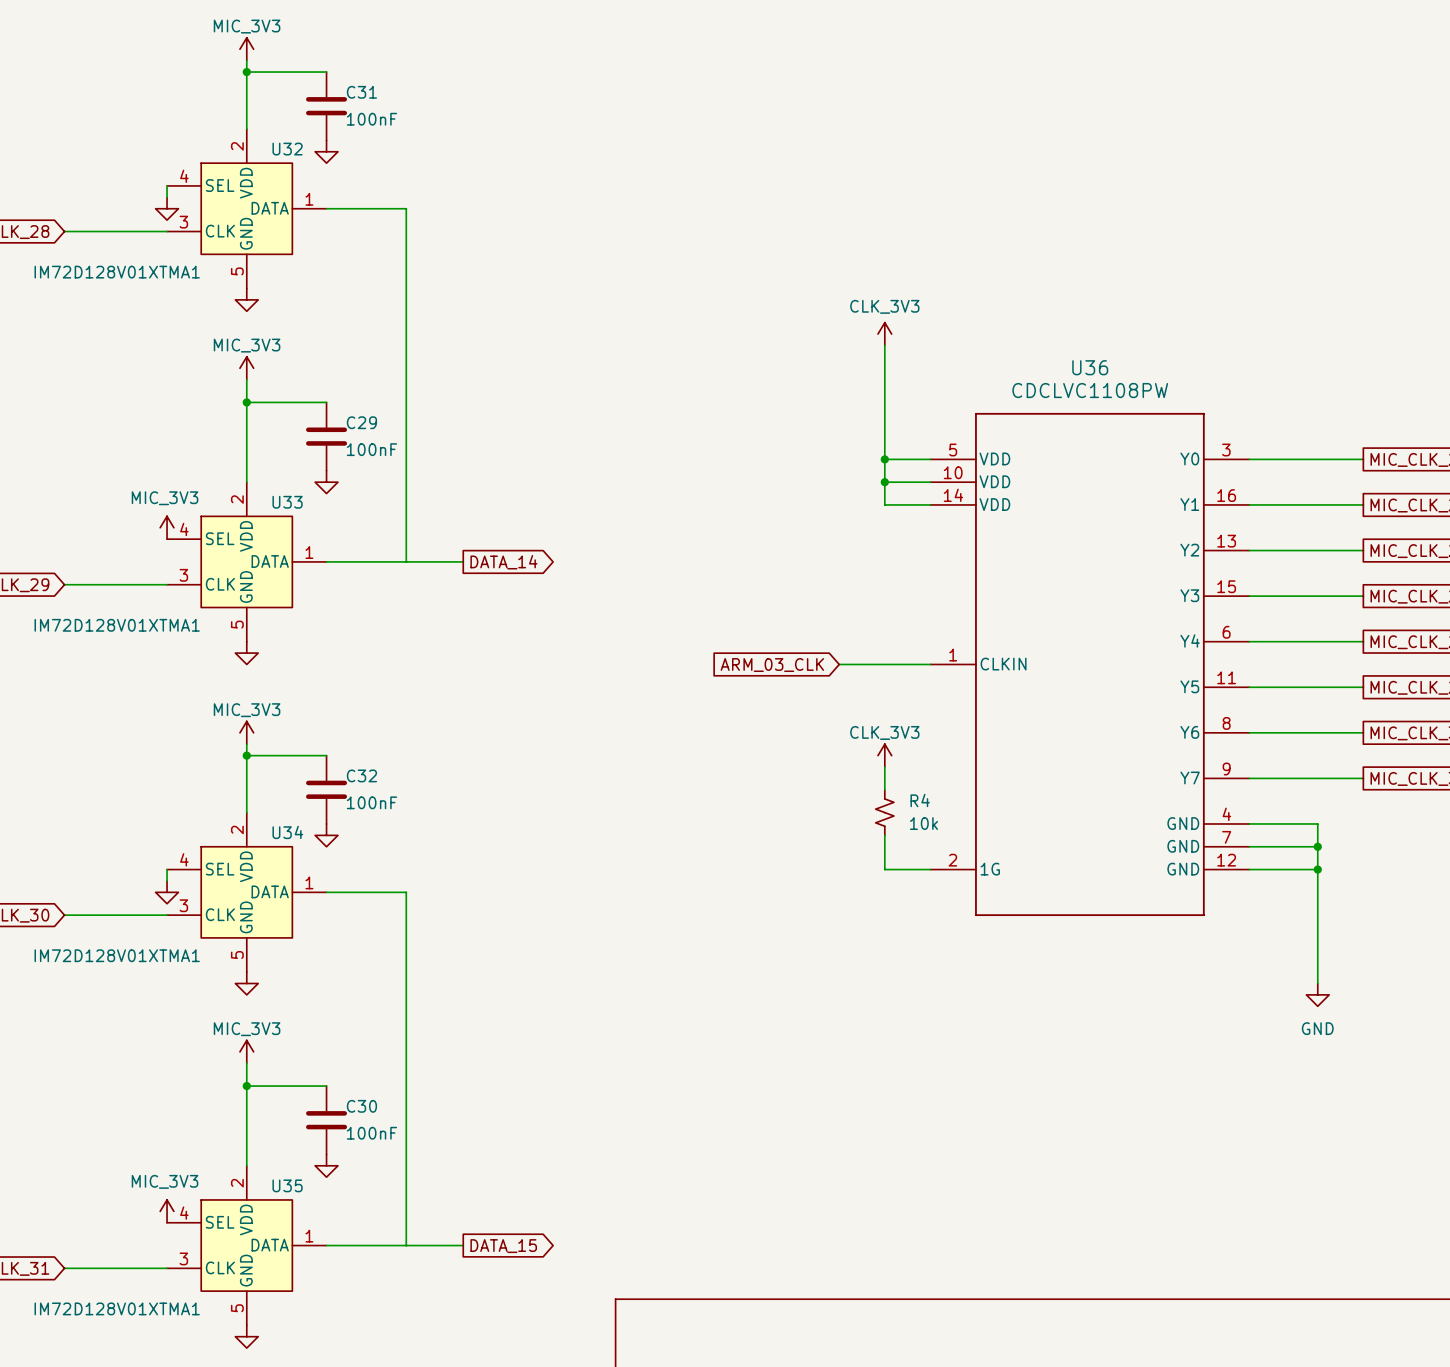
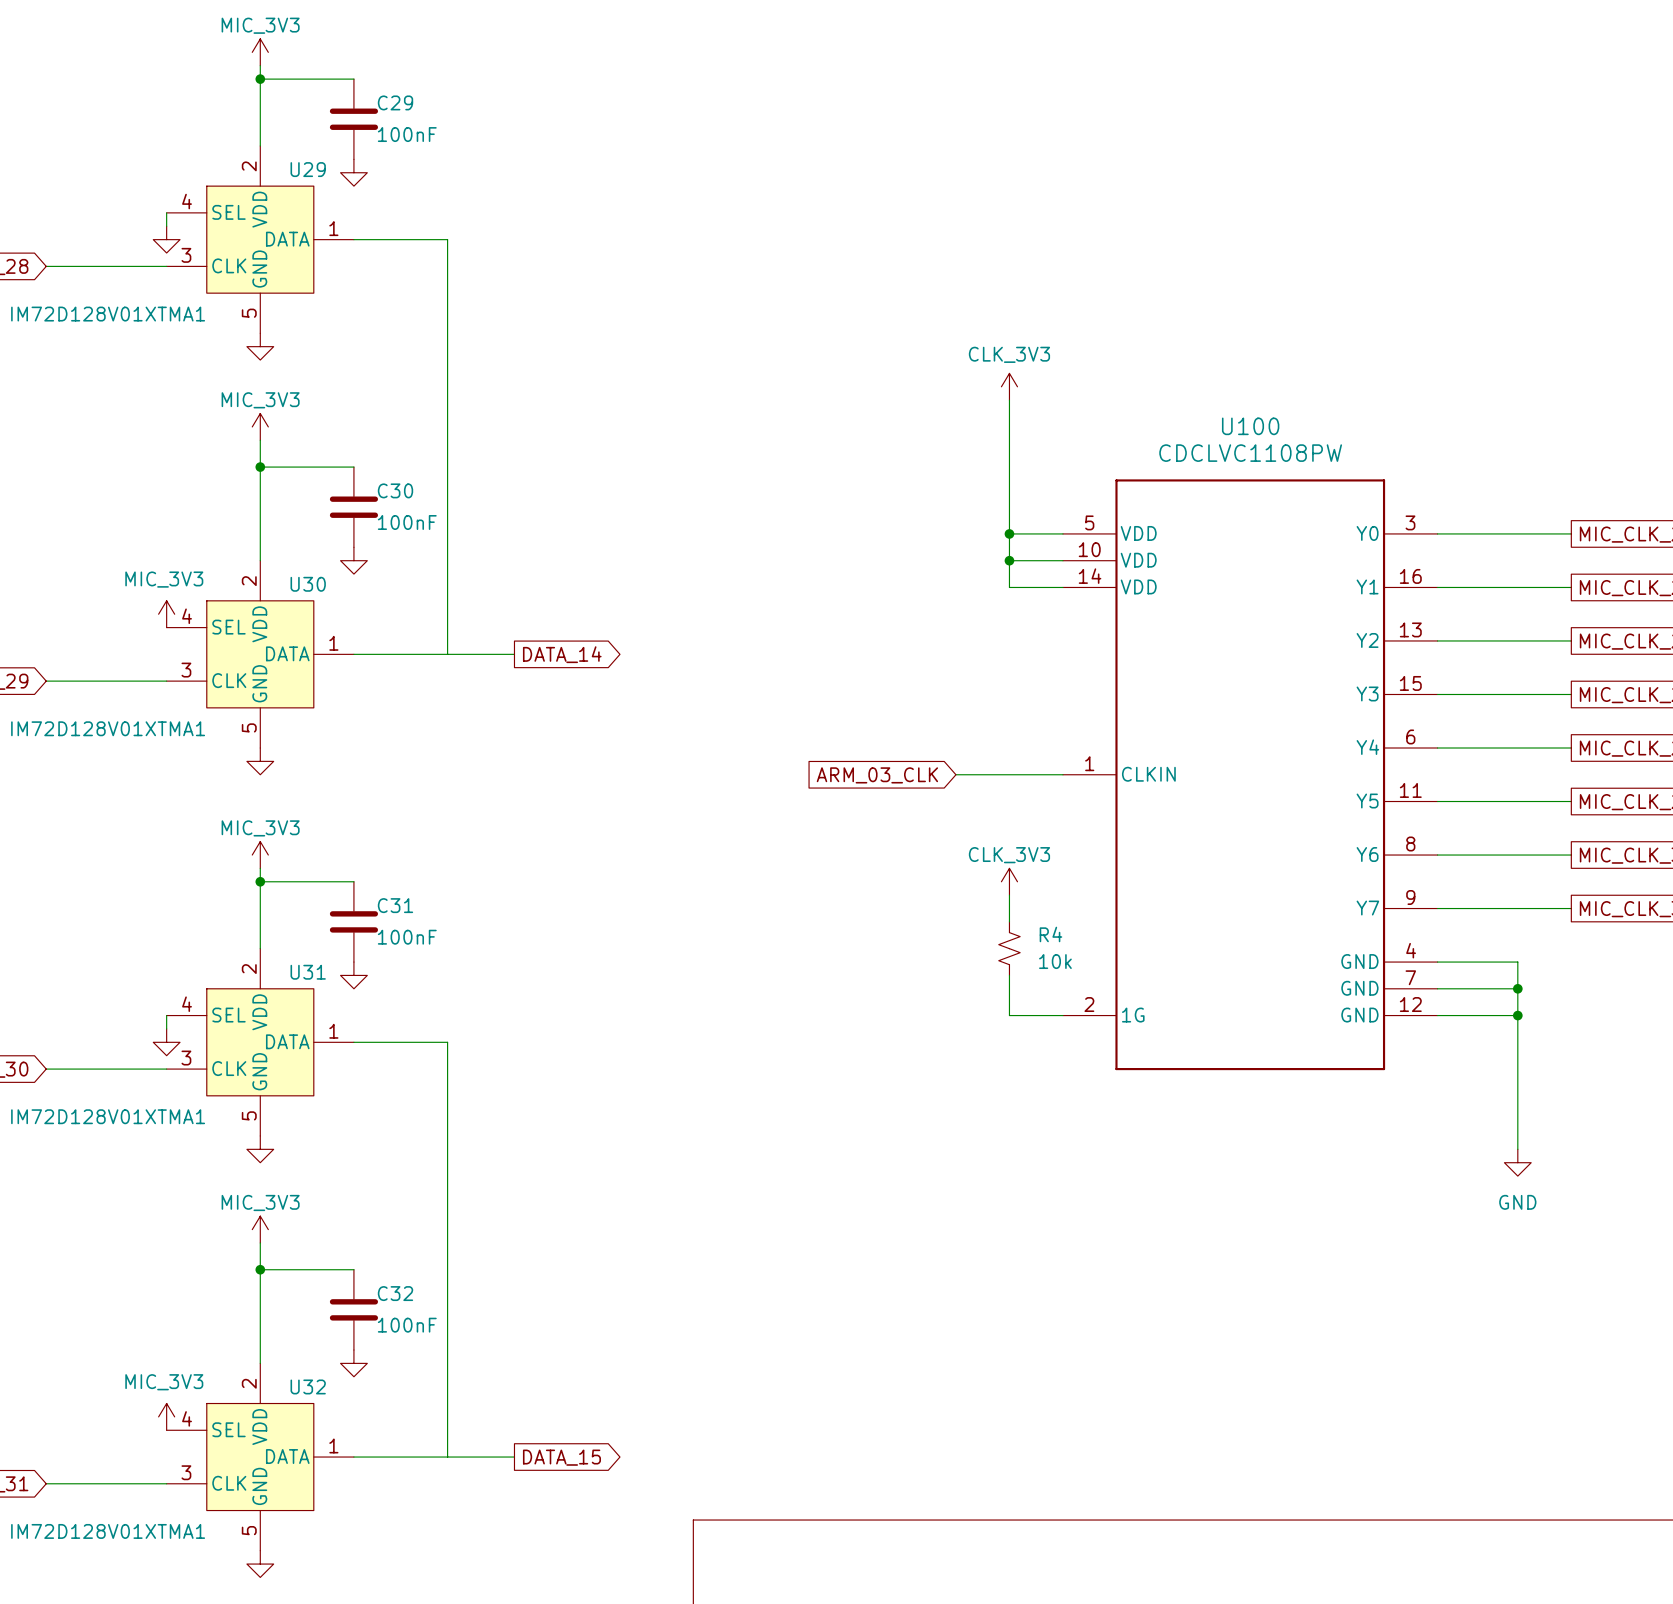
C31 name: C31 (361, 92) -> C29 (395, 102)
U32 name: U32 (287, 149) -> U29 (308, 169)
U36 name: U36 (1090, 367) -> U100 (1250, 426)
C29 name: C29 (361, 422) -> C30 (395, 490)
U33 name: U33 (287, 502) -> U30 (308, 584)
C32 name: C32 (361, 775) -> C31 (395, 905)
U34 name: U34 (287, 832) -> U31 (308, 972)
C30 name: C30 (361, 1106) -> C32 (395, 1293)
U35 name: U35 (287, 1185) -> U32 (308, 1386)

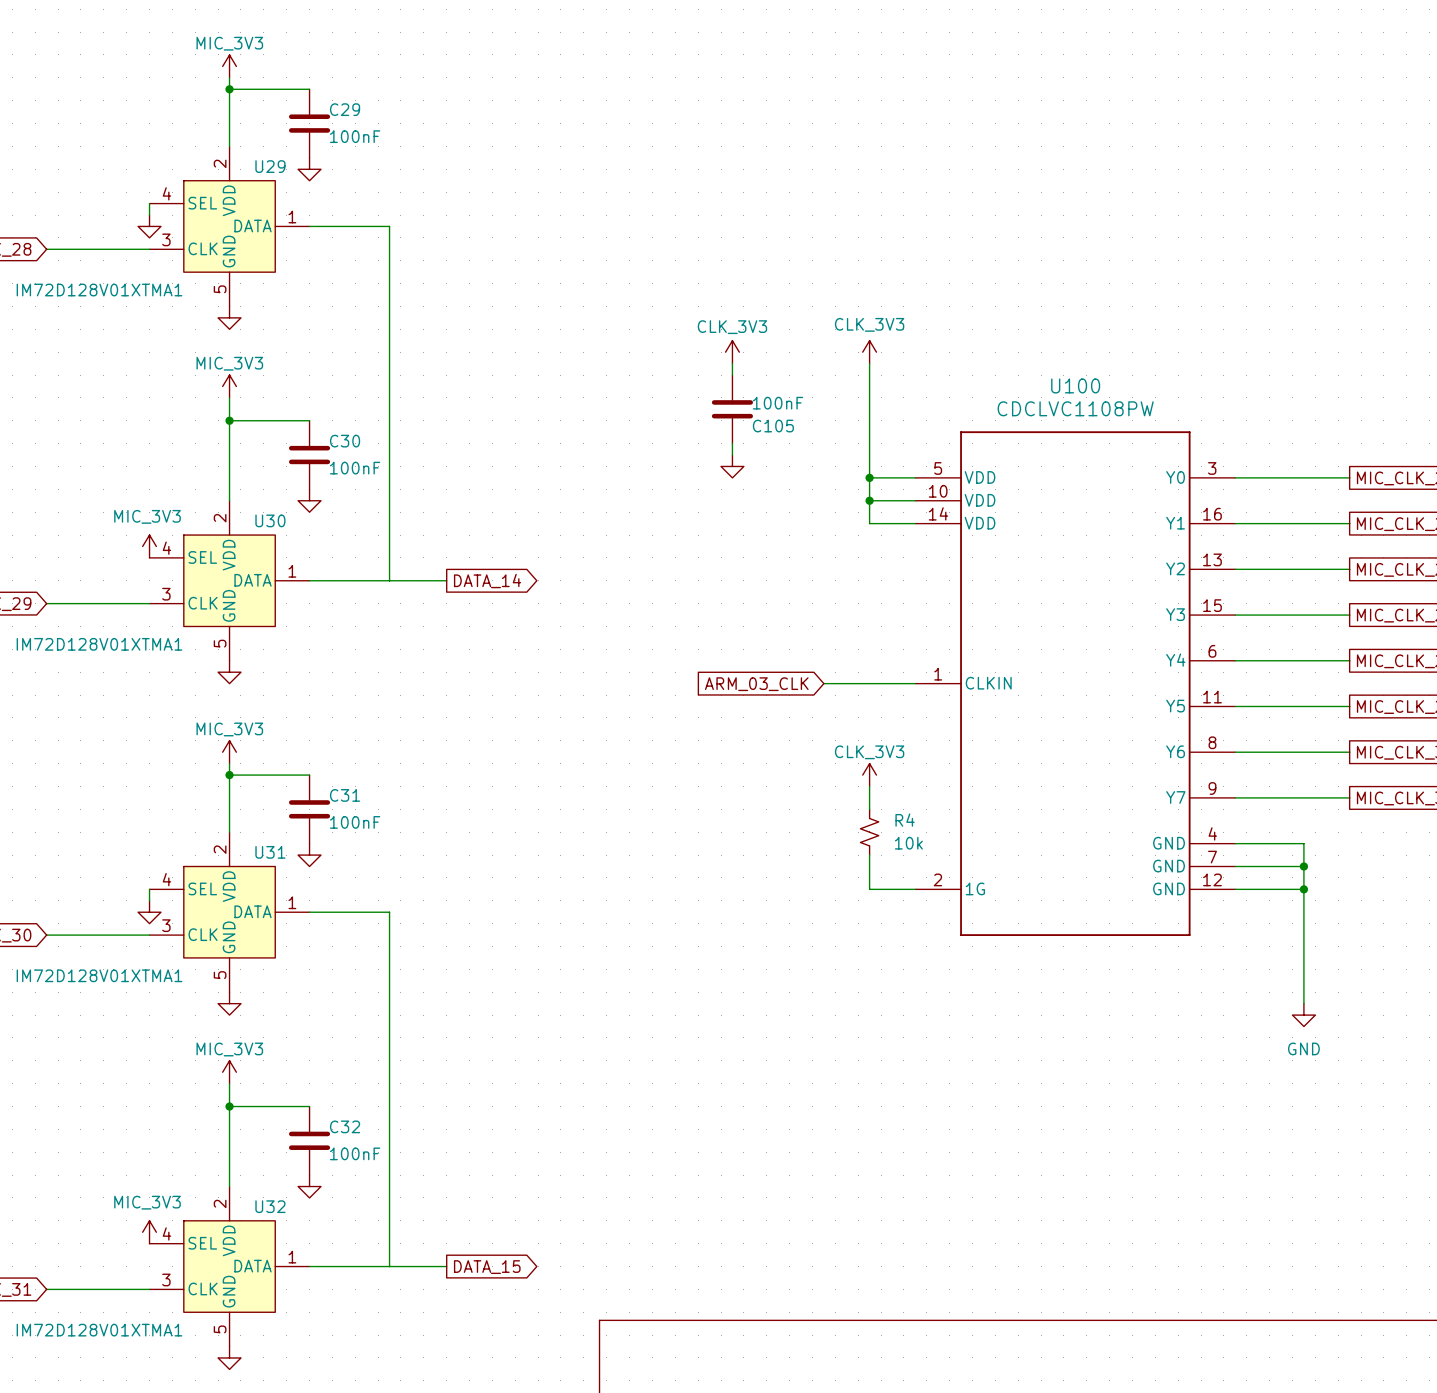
power symbol: none -> CLK_3V3 (732, 352)
wire: none -> (732, 363) (732, 375)
C105: none -> 100nF (732, 409)
wire: none -> (732, 443) (732, 455)
power symbol: none -> (732, 466)

